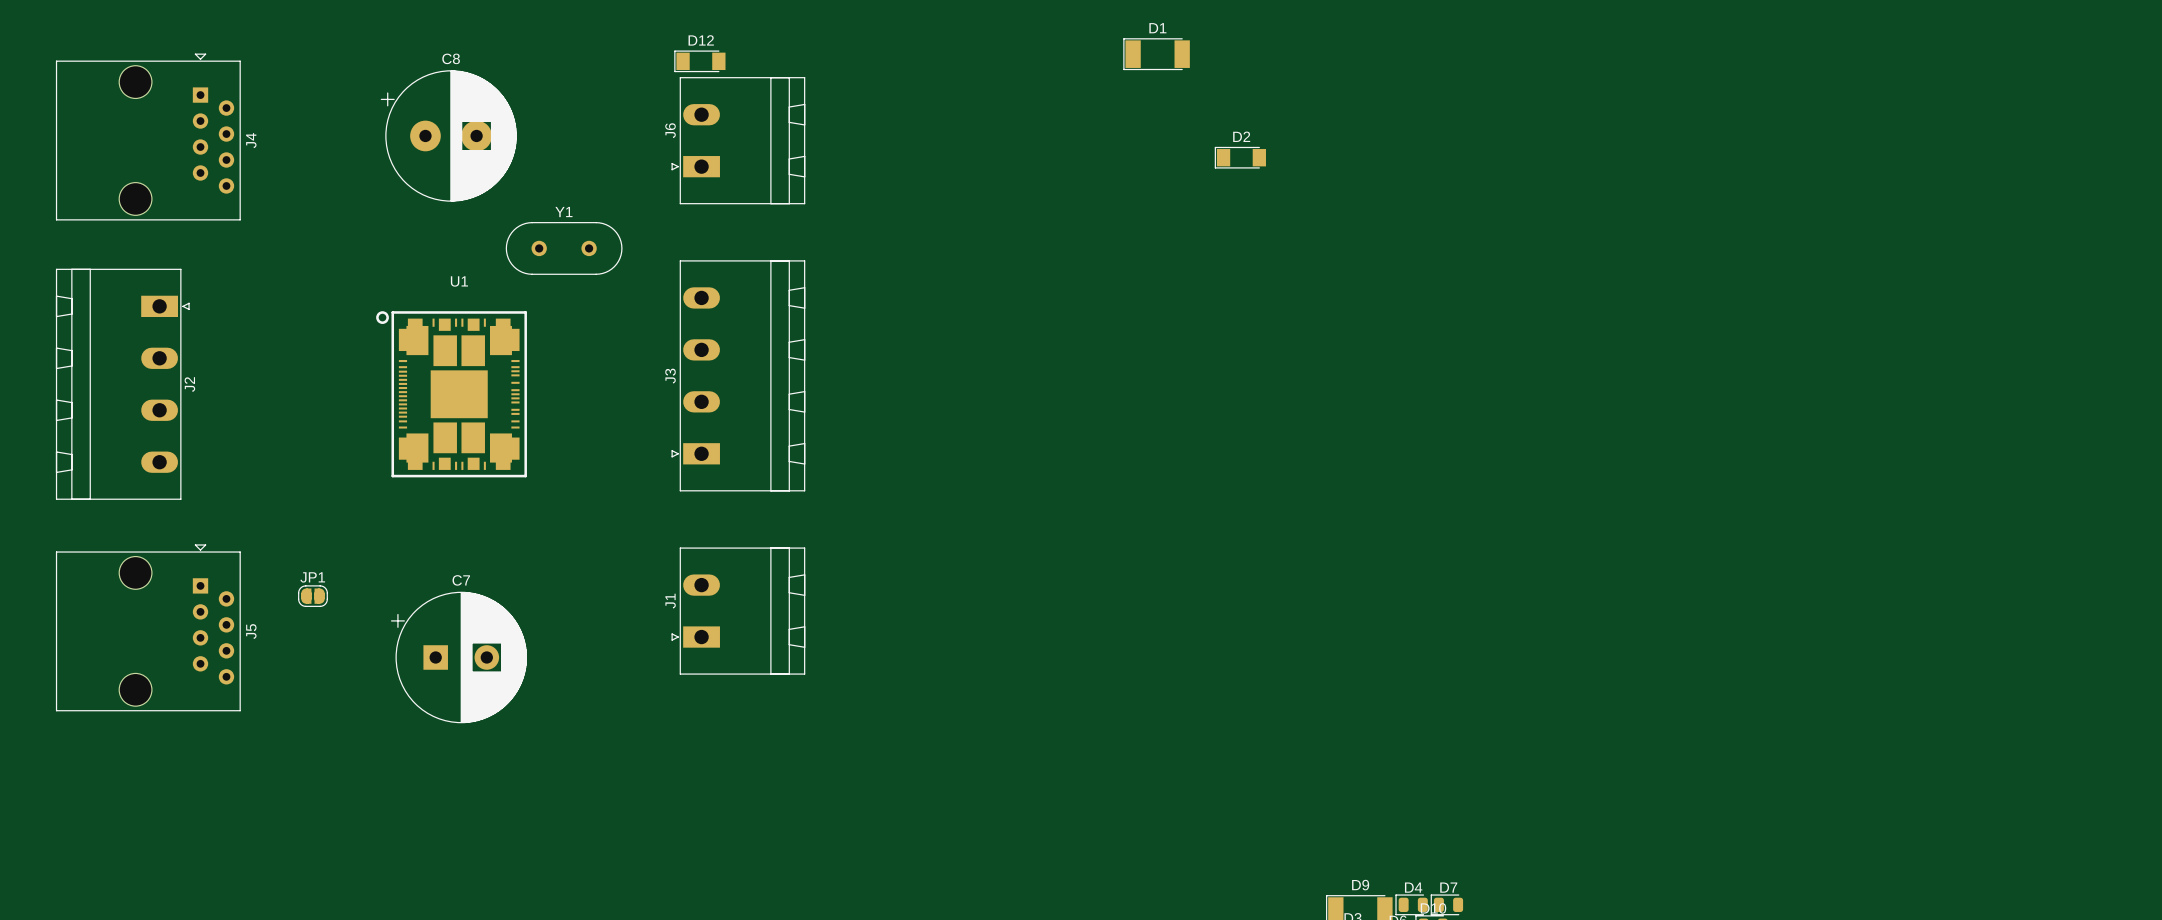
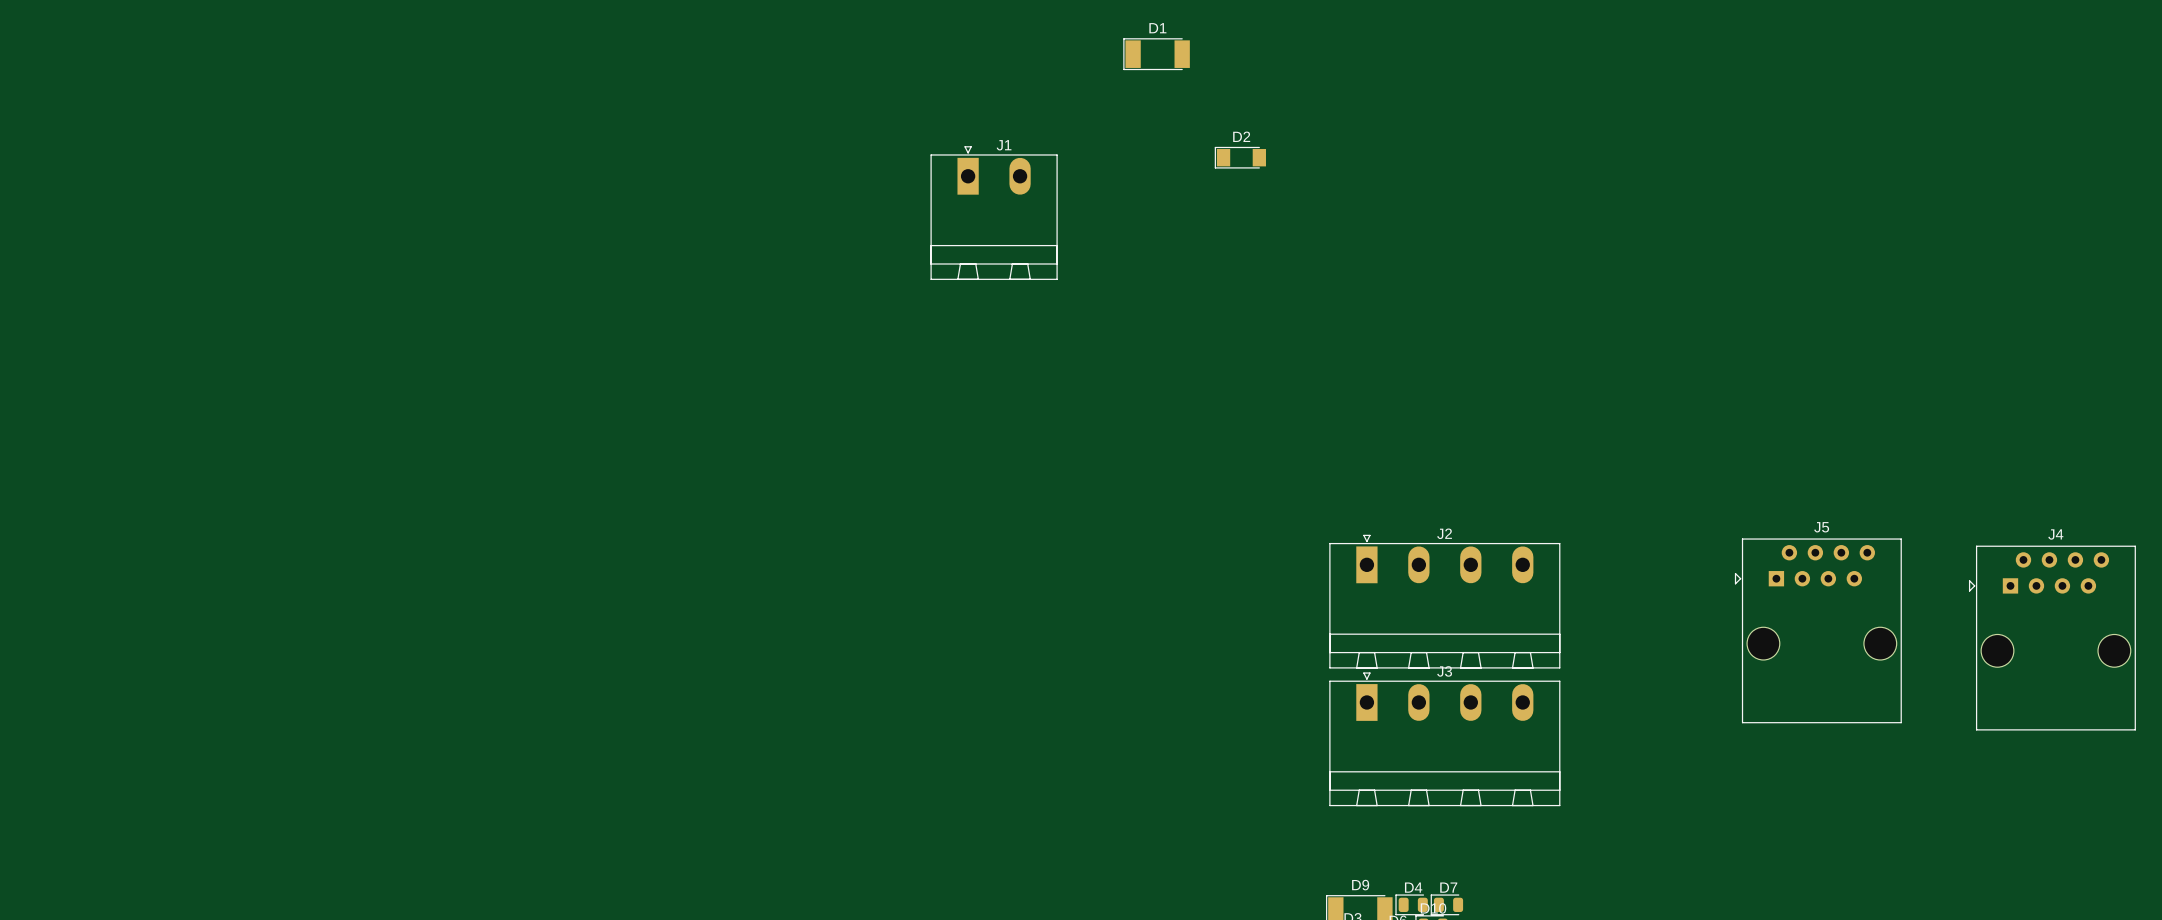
D12: (699, 61) -> none
C8: (448, 135) -> none
J4 rotation: 0° (148, 137) -> 90° counterclockwise (2052, 638)
J4 position: (148, 137) -> (2052, 638)
J6: (738, 140) -> none
Y1: (564, 248) -> none
J3 rotation: 0° (738, 375) -> 90° clockwise (1444, 739)
J3 position: (738, 375) -> (1444, 739)
J2 rotation: 0° (122, 384) -> 90° counterclockwise (1444, 601)
J2 position: (122, 384) -> (1444, 601)
U1: (451, 394) -> none
JP1: (312, 596) -> none
J1 rotation: 0° (738, 611) -> 90° clockwise (994, 213)
J1 position: (738, 611) -> (994, 213)
J5 rotation: 0° (148, 627) -> 90° counterclockwise (1818, 630)
J5 position: (148, 627) -> (1818, 630)
C7: (458, 657) -> none

